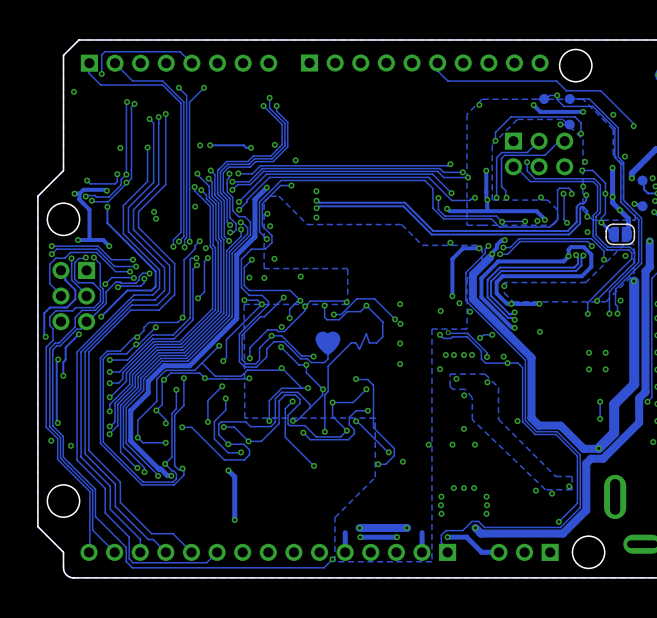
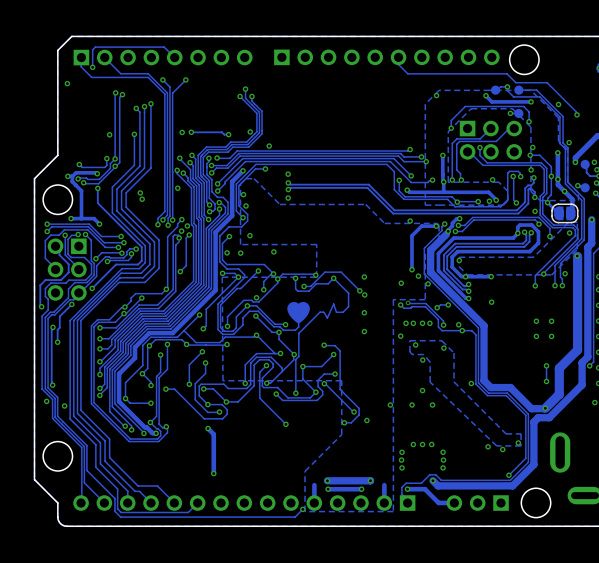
via: none -> (181, 231)
via: (196, 258) -> none
via: none -> (179, 238)
via: (196, 265) -> none

